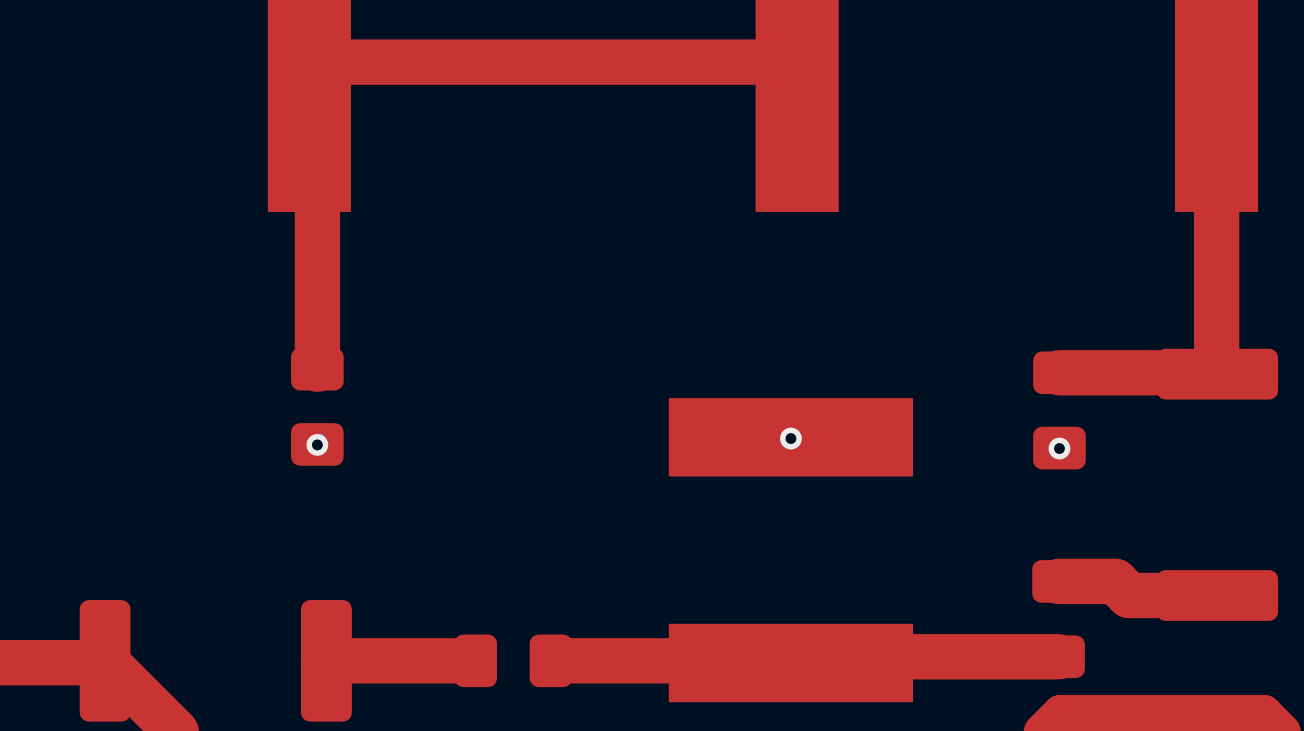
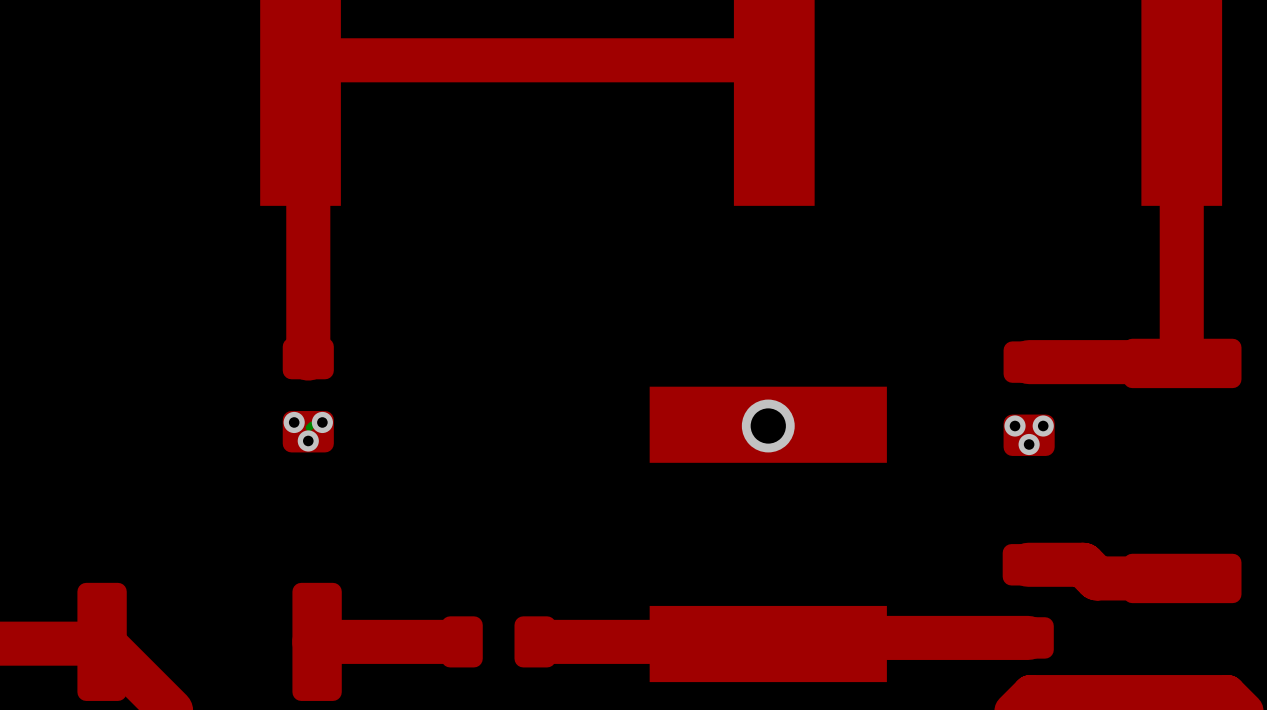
via size: [780, 427, 802, 450] -> [741, 399, 795, 453]
via: none -> (294, 422)
via: none -> (322, 422)
via: none -> (1015, 426)
via: none -> (1043, 426)
via: (317, 444) -> none
via: (1059, 448) -> none
via: none -> (308, 440)
via: none -> (1029, 444)

